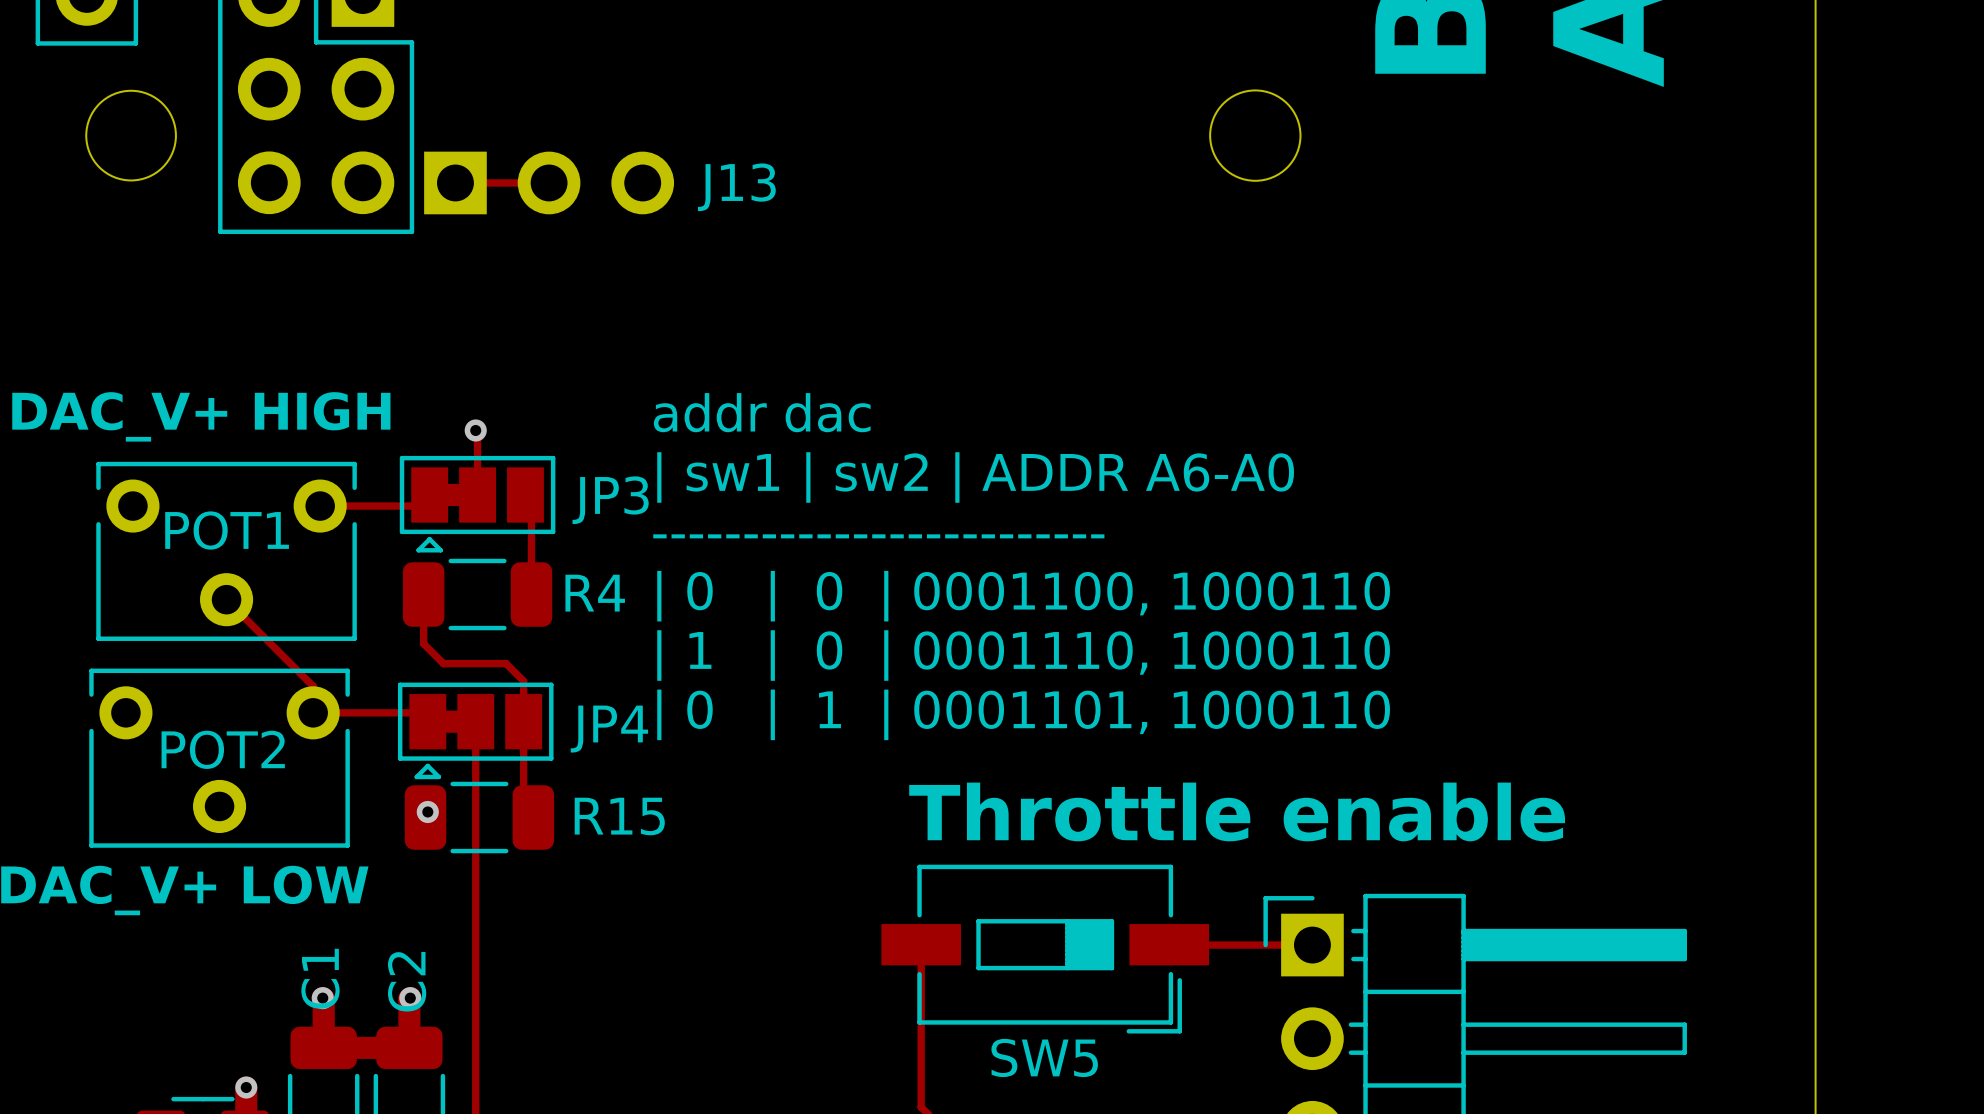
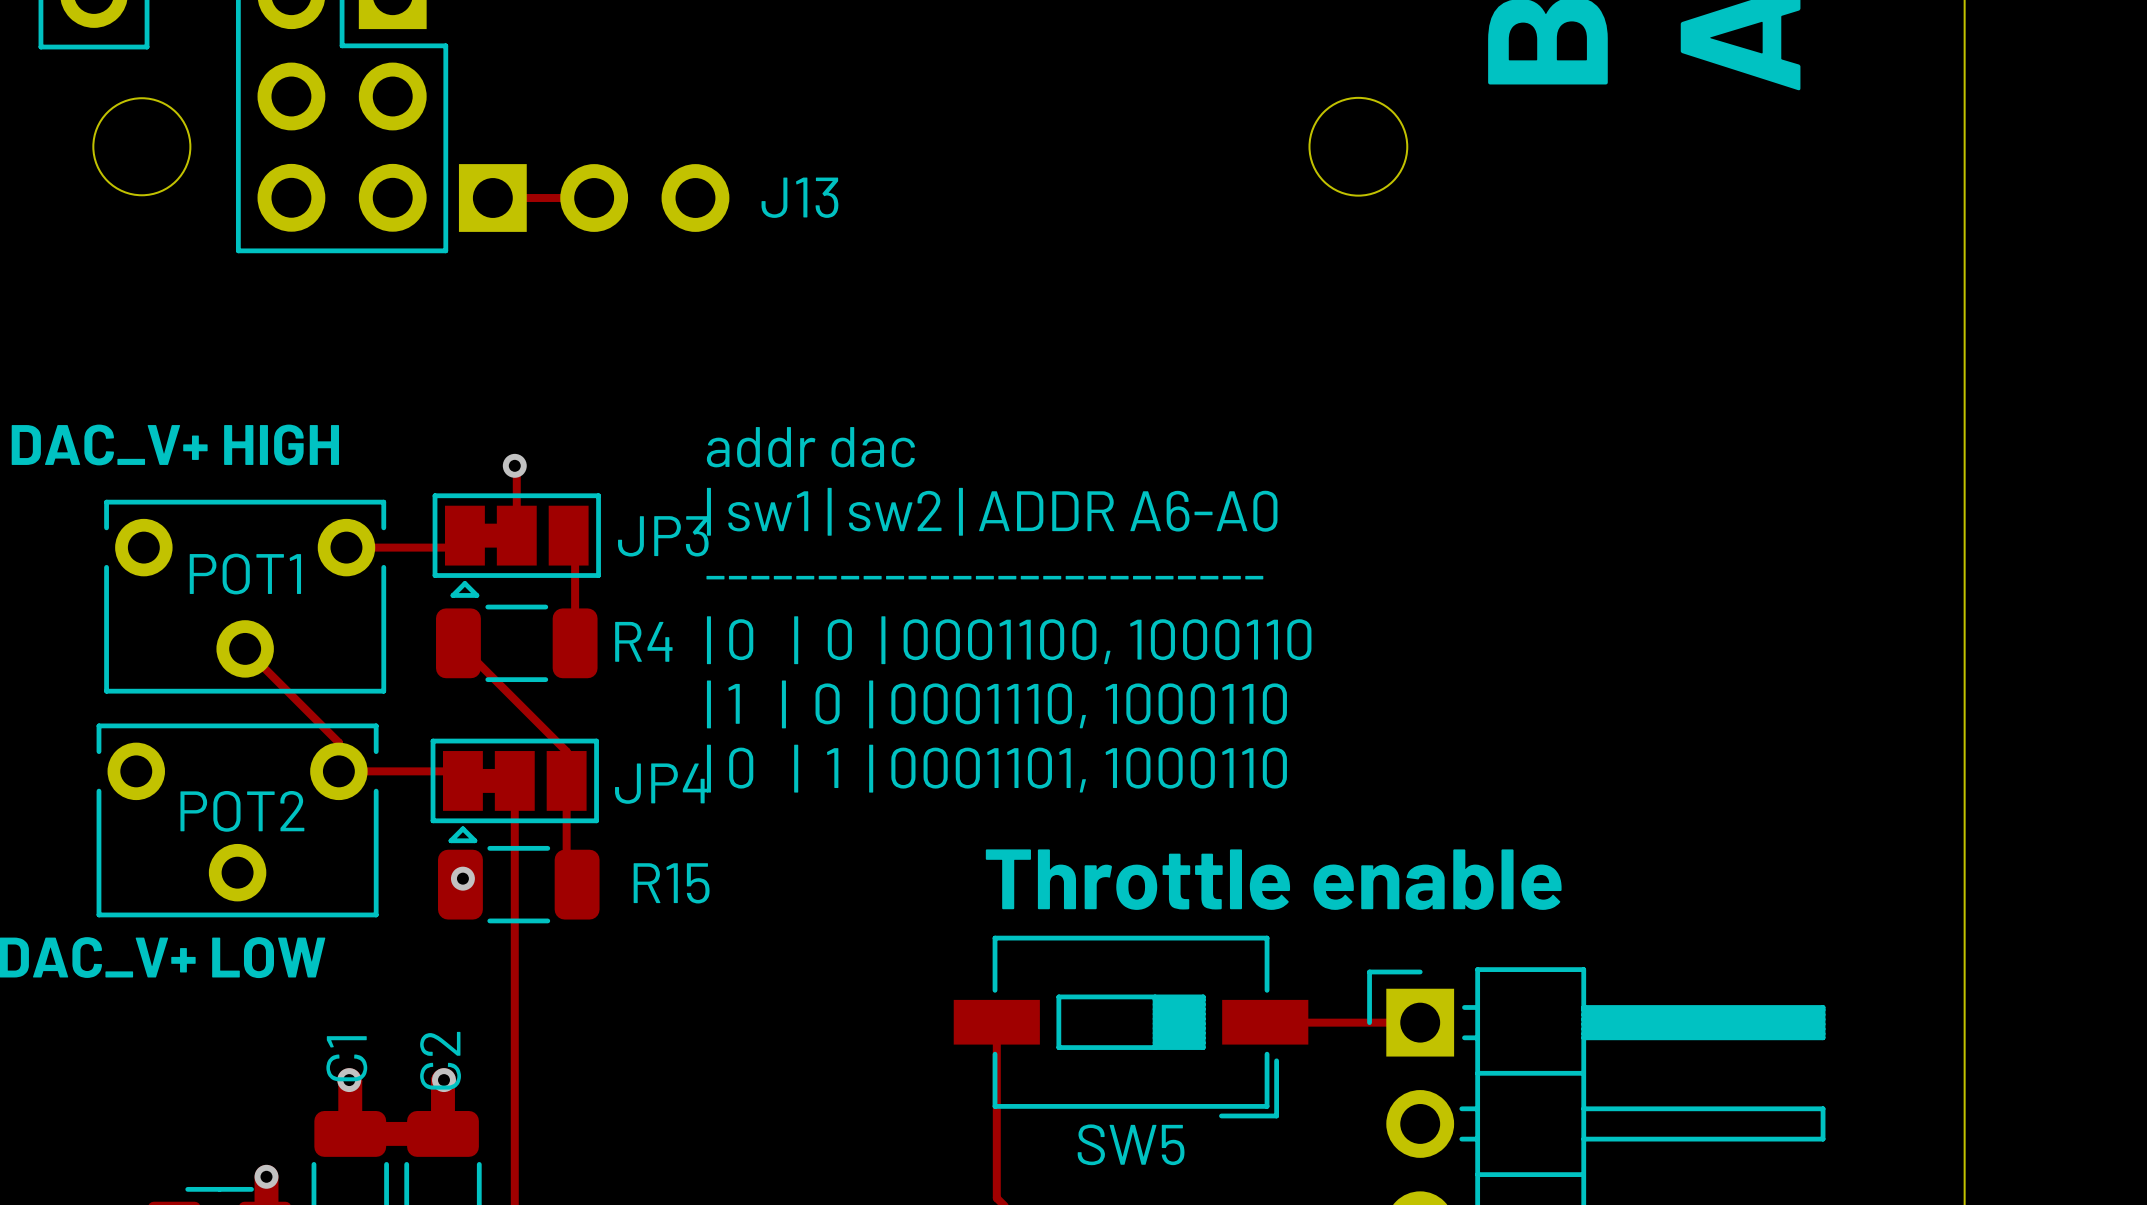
track: (423, 594) (423, 643) (443, 663) (506, 663) (523, 681) (523, 694) -> (458, 643) (566, 751)

